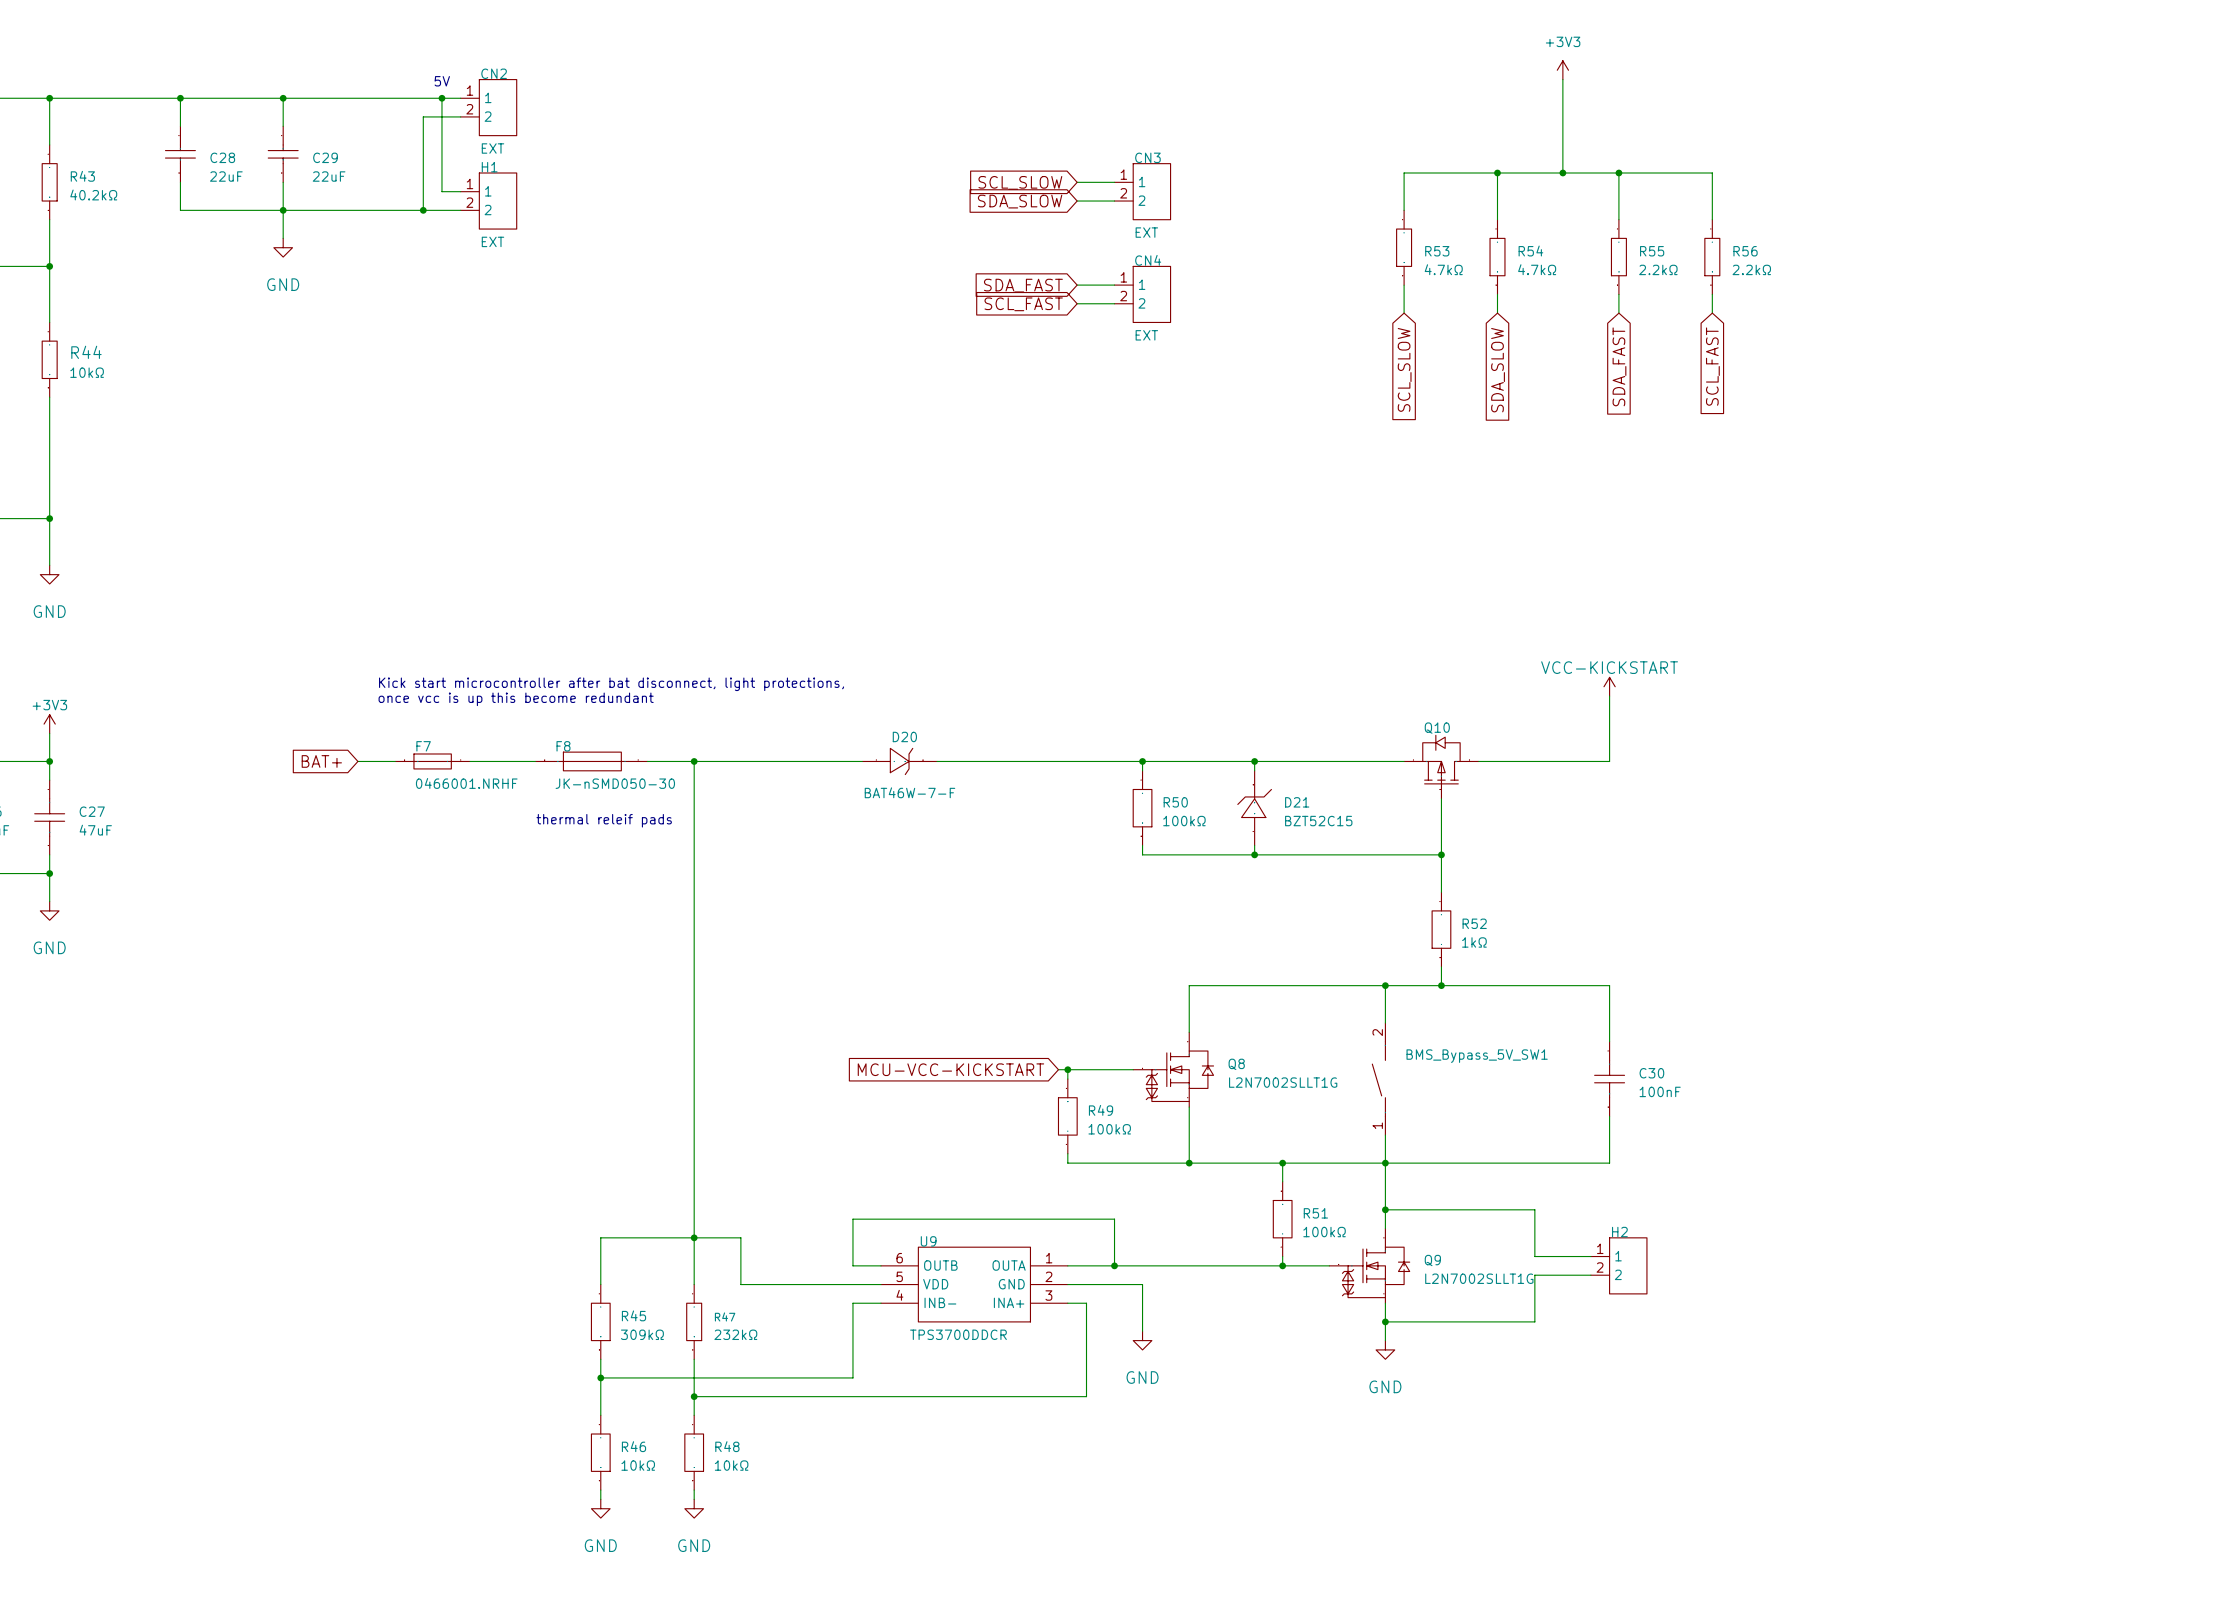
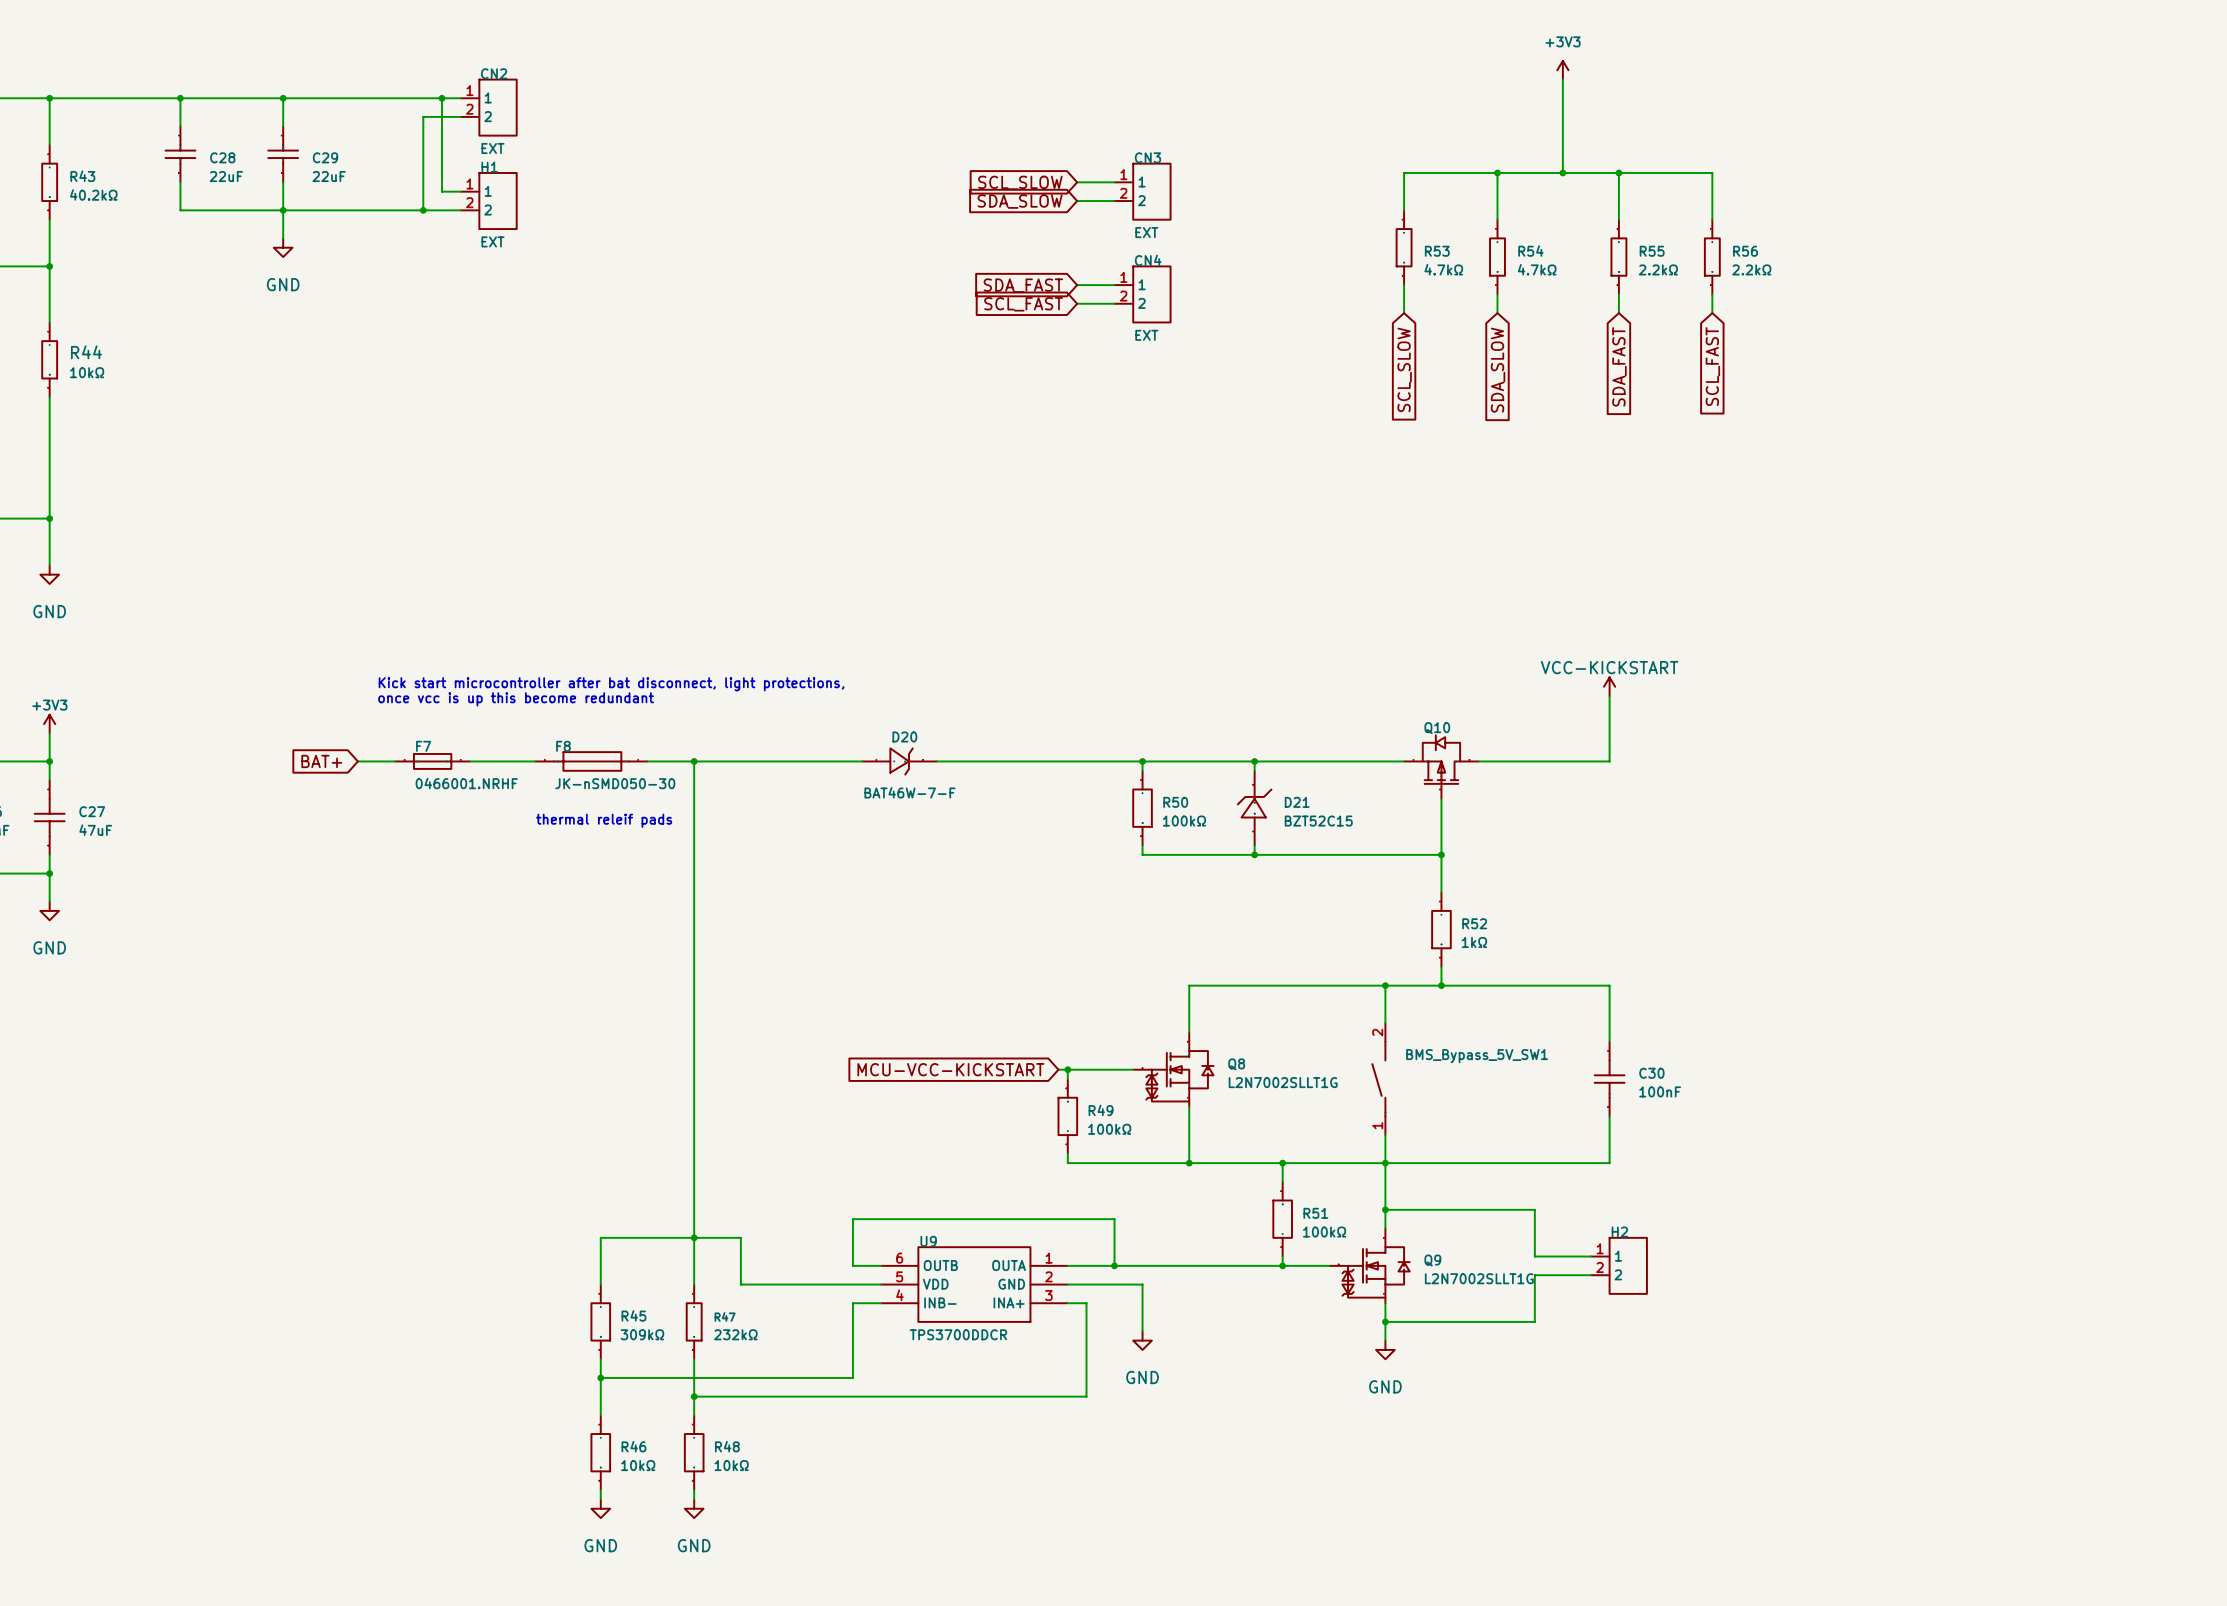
text: 5V (442, 81) -> none

